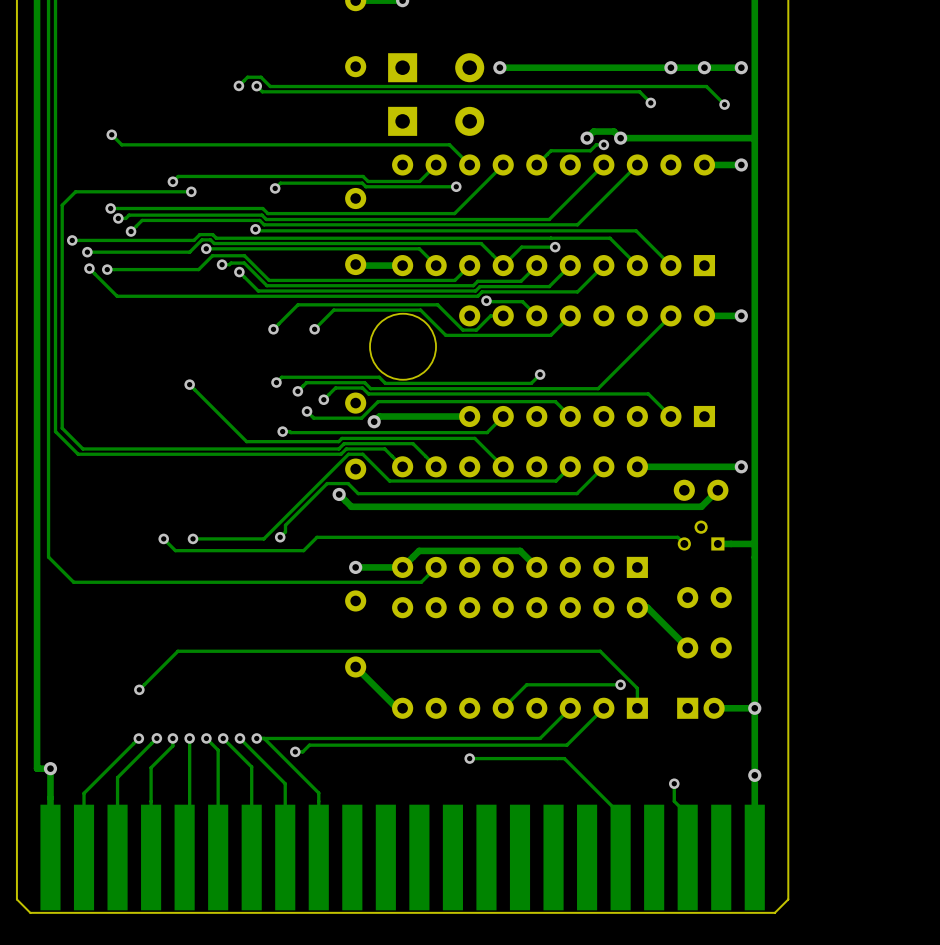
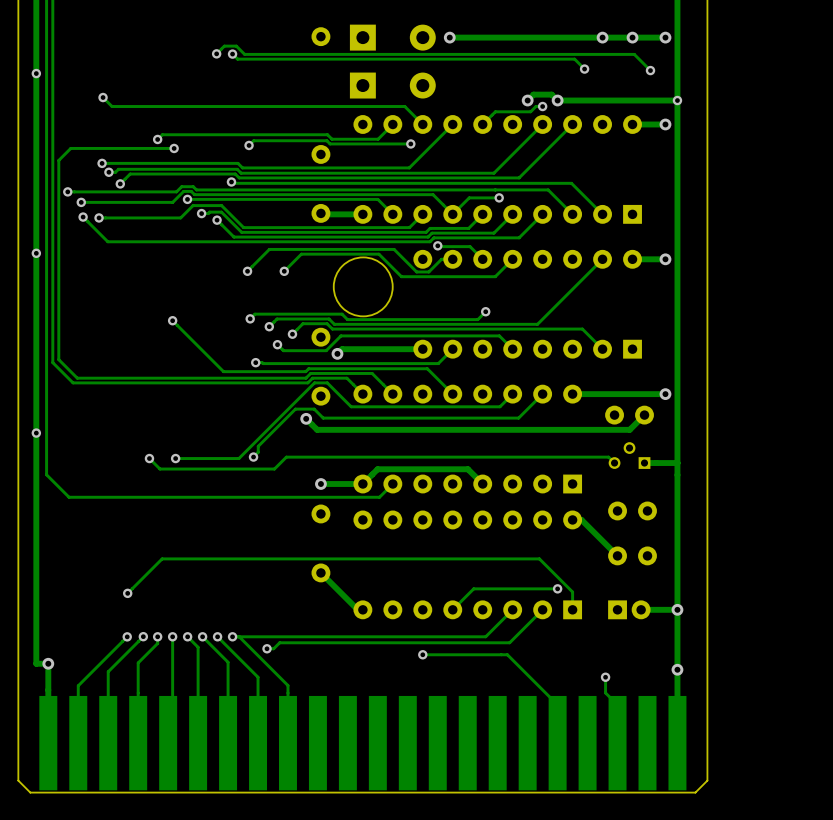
via: none -> (36, 73)
via: none -> (677, 100)
via: none -> (36, 253)
via: none -> (36, 433)

